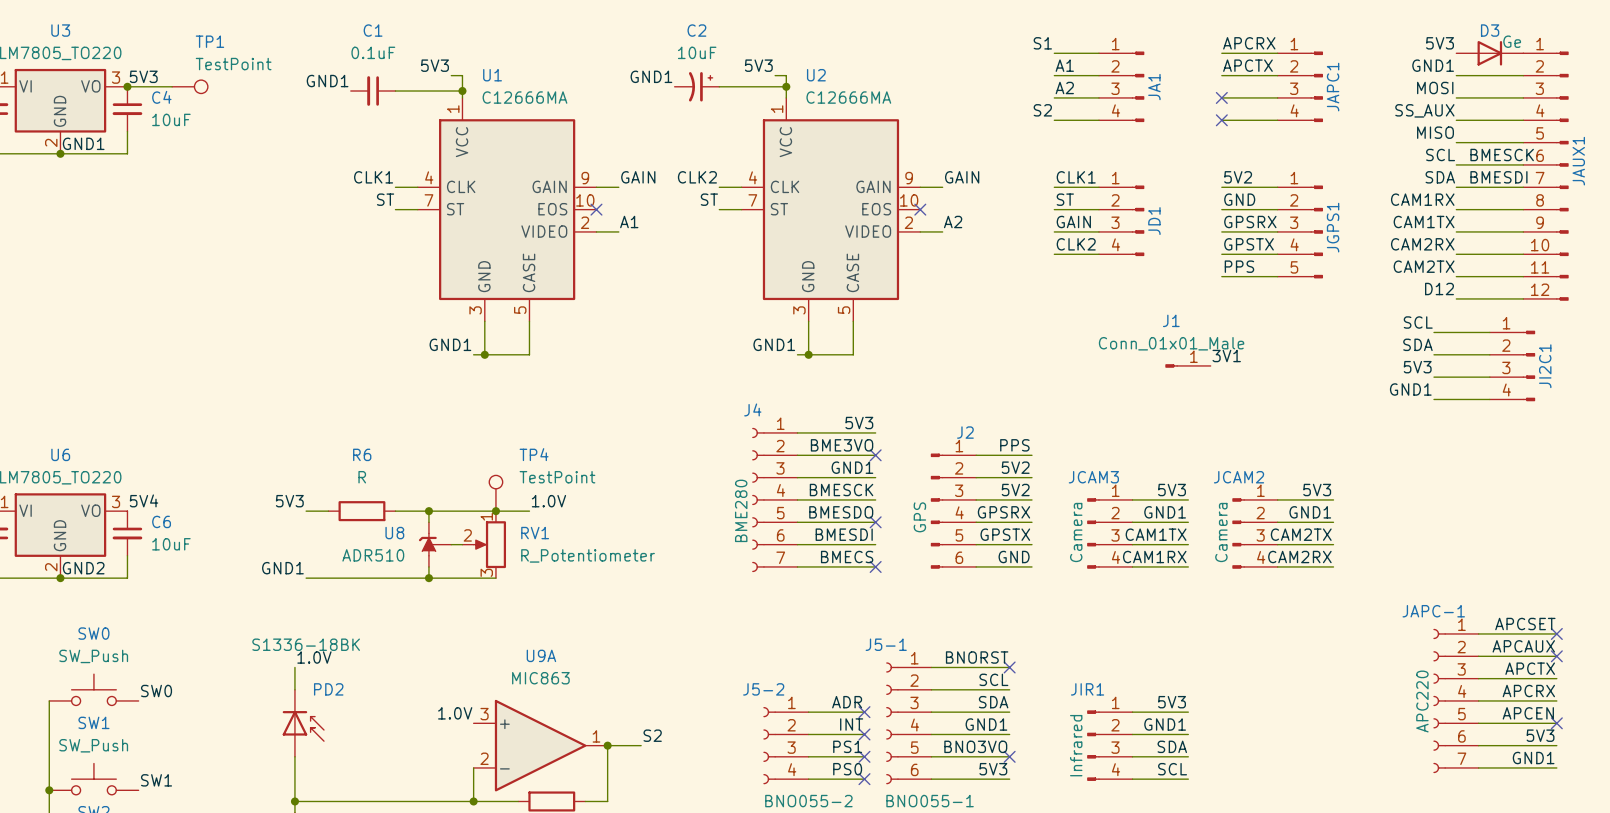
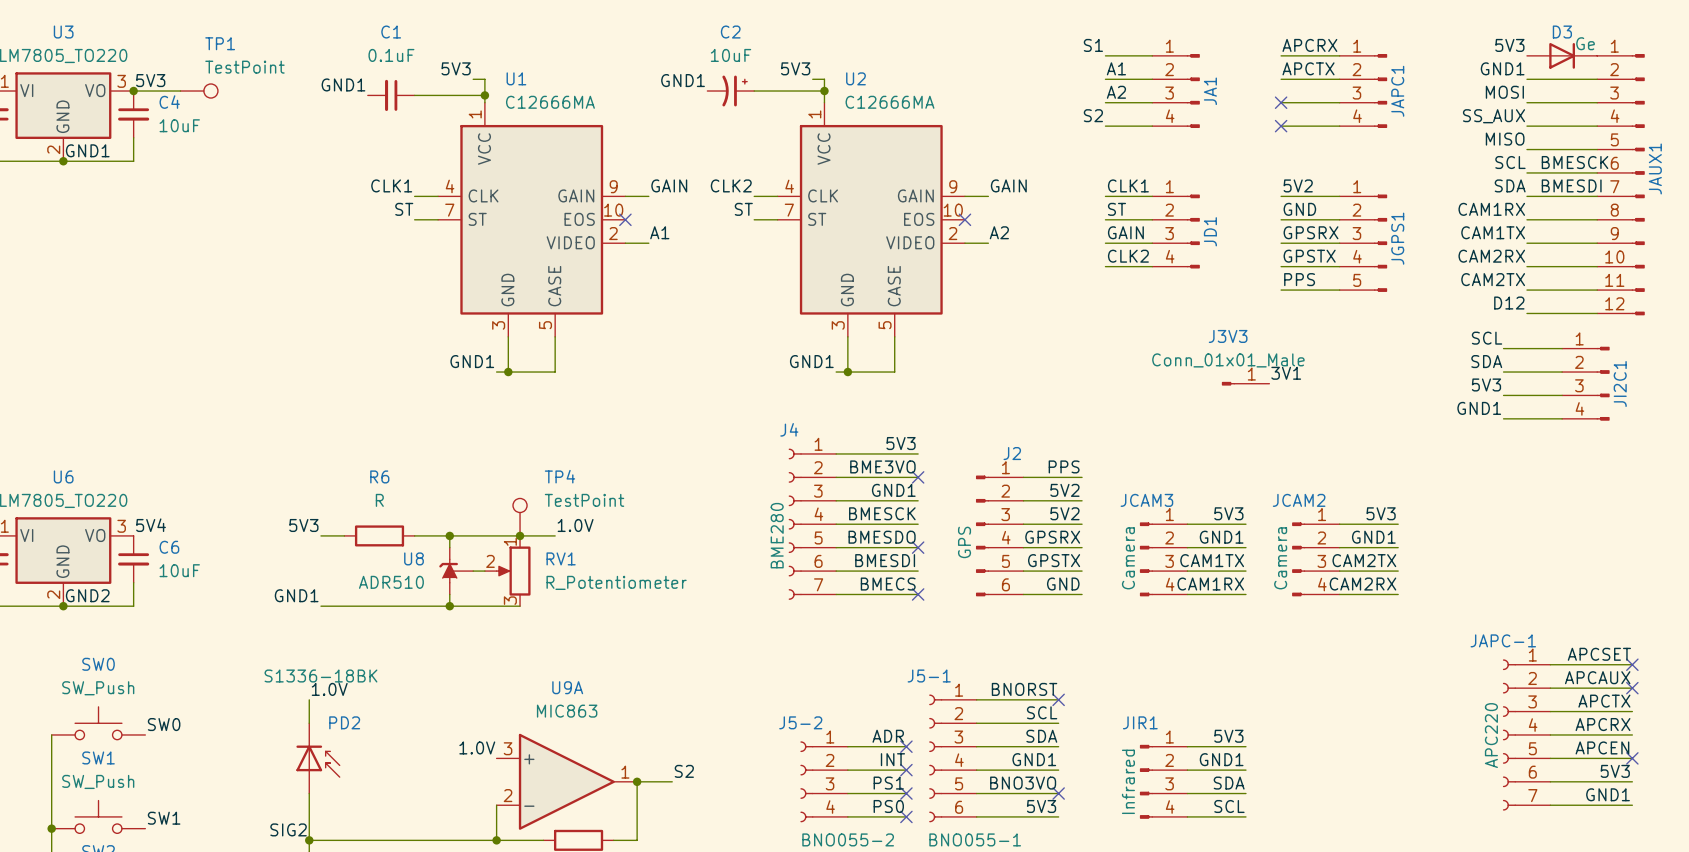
J1 name: J1 (1171, 320) -> J3V3 (1228, 336)
label: none -> SIG2 (288, 829)

